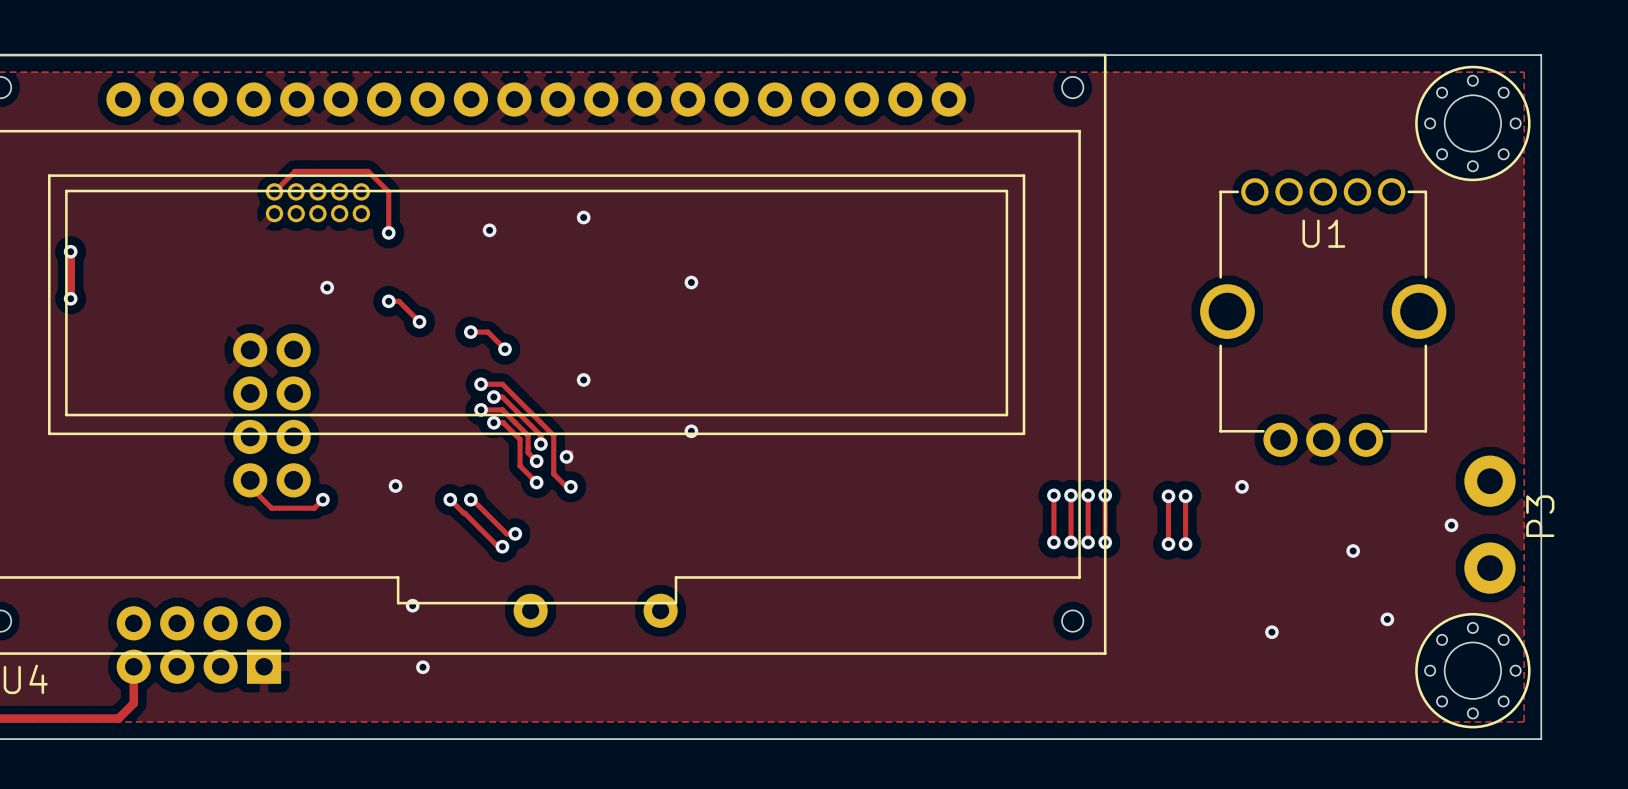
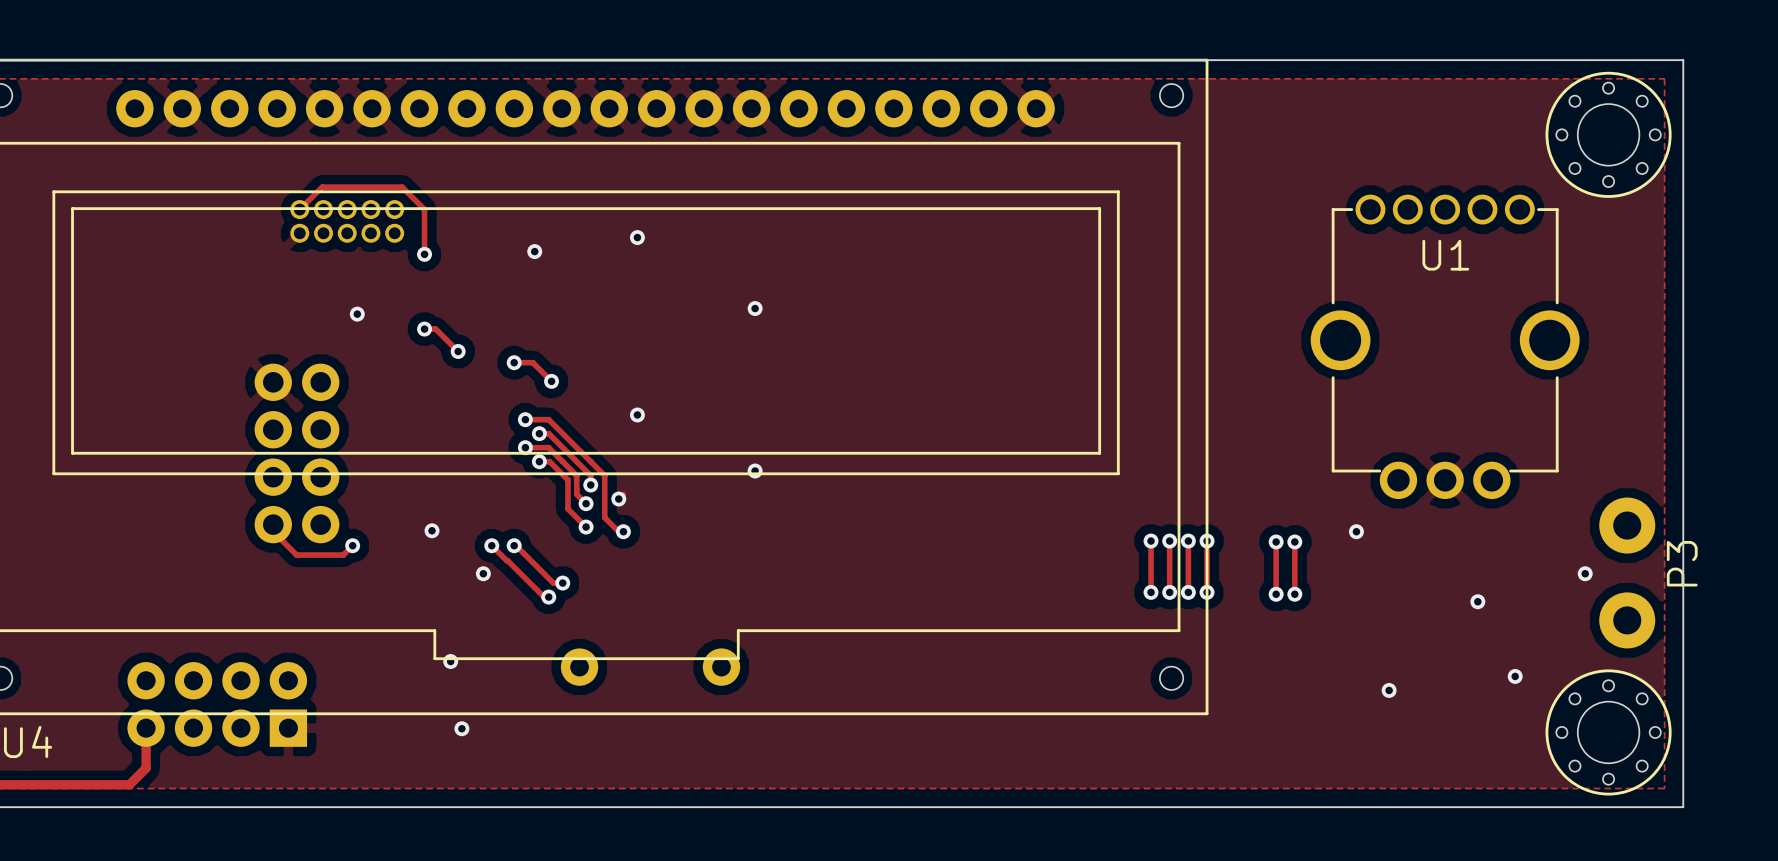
track: (70, 251) (70, 298) -> none
via: (70, 251) -> none
via: (70, 298) -> none
via: none -> (483, 573)

